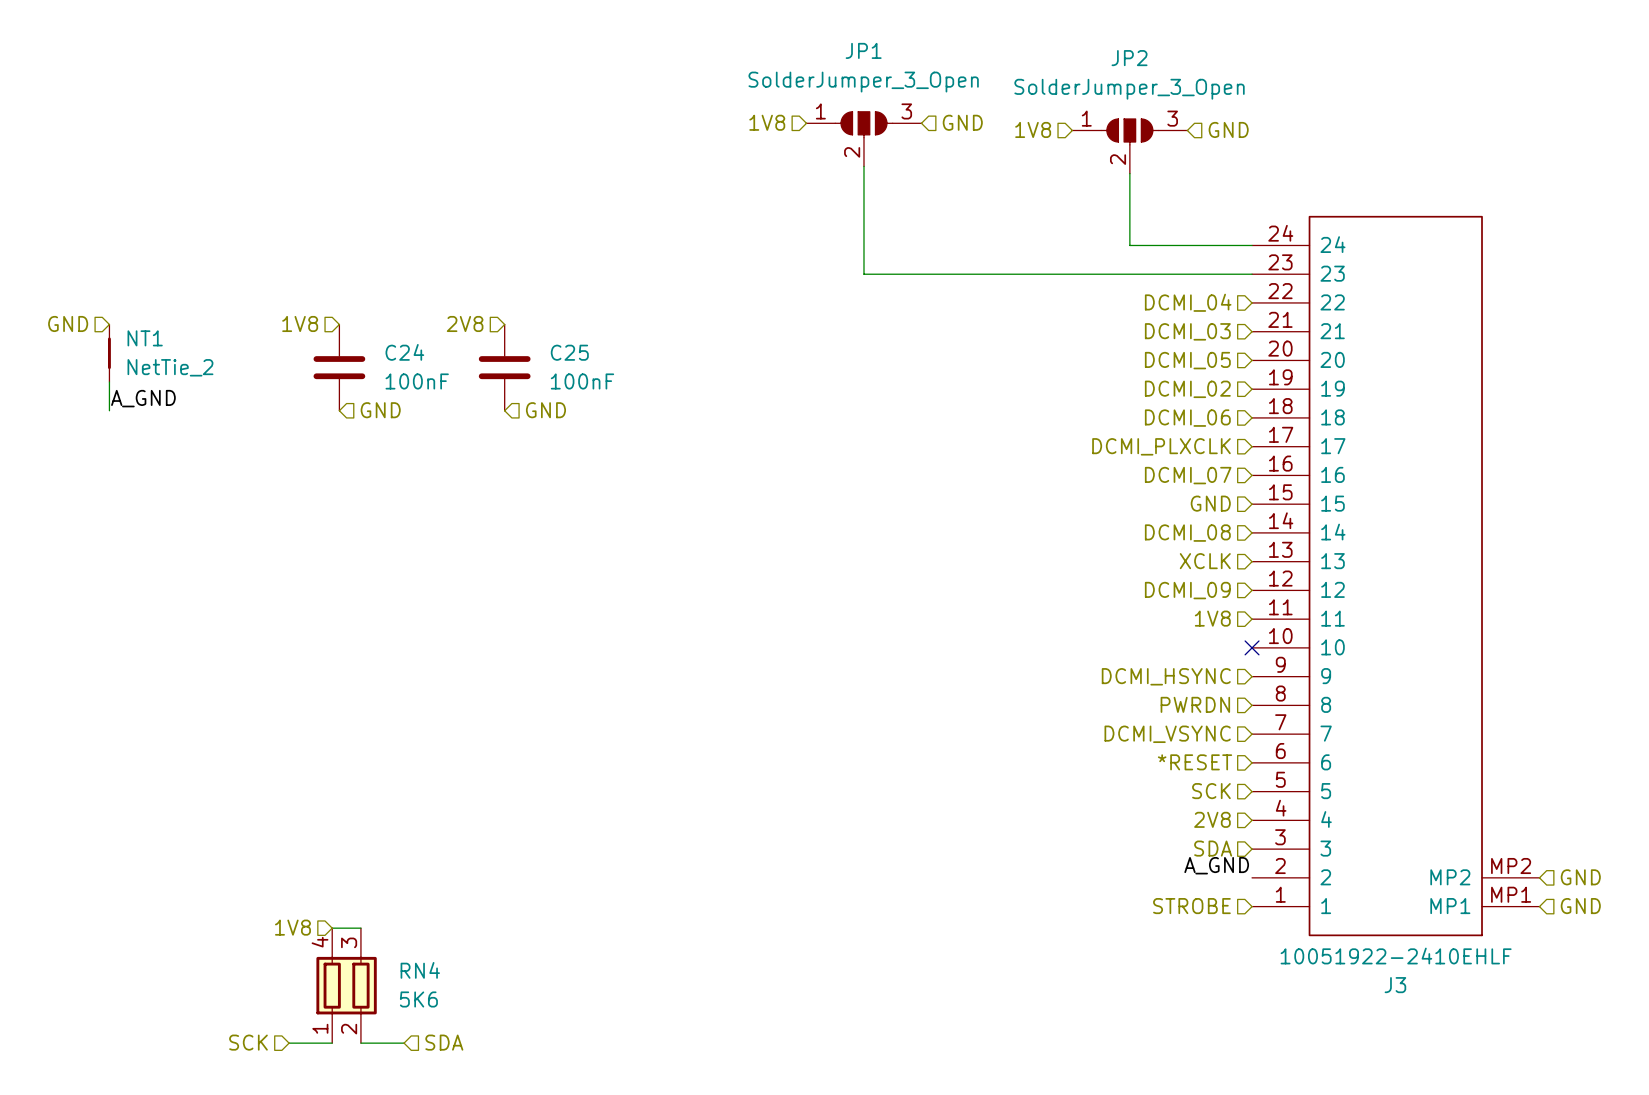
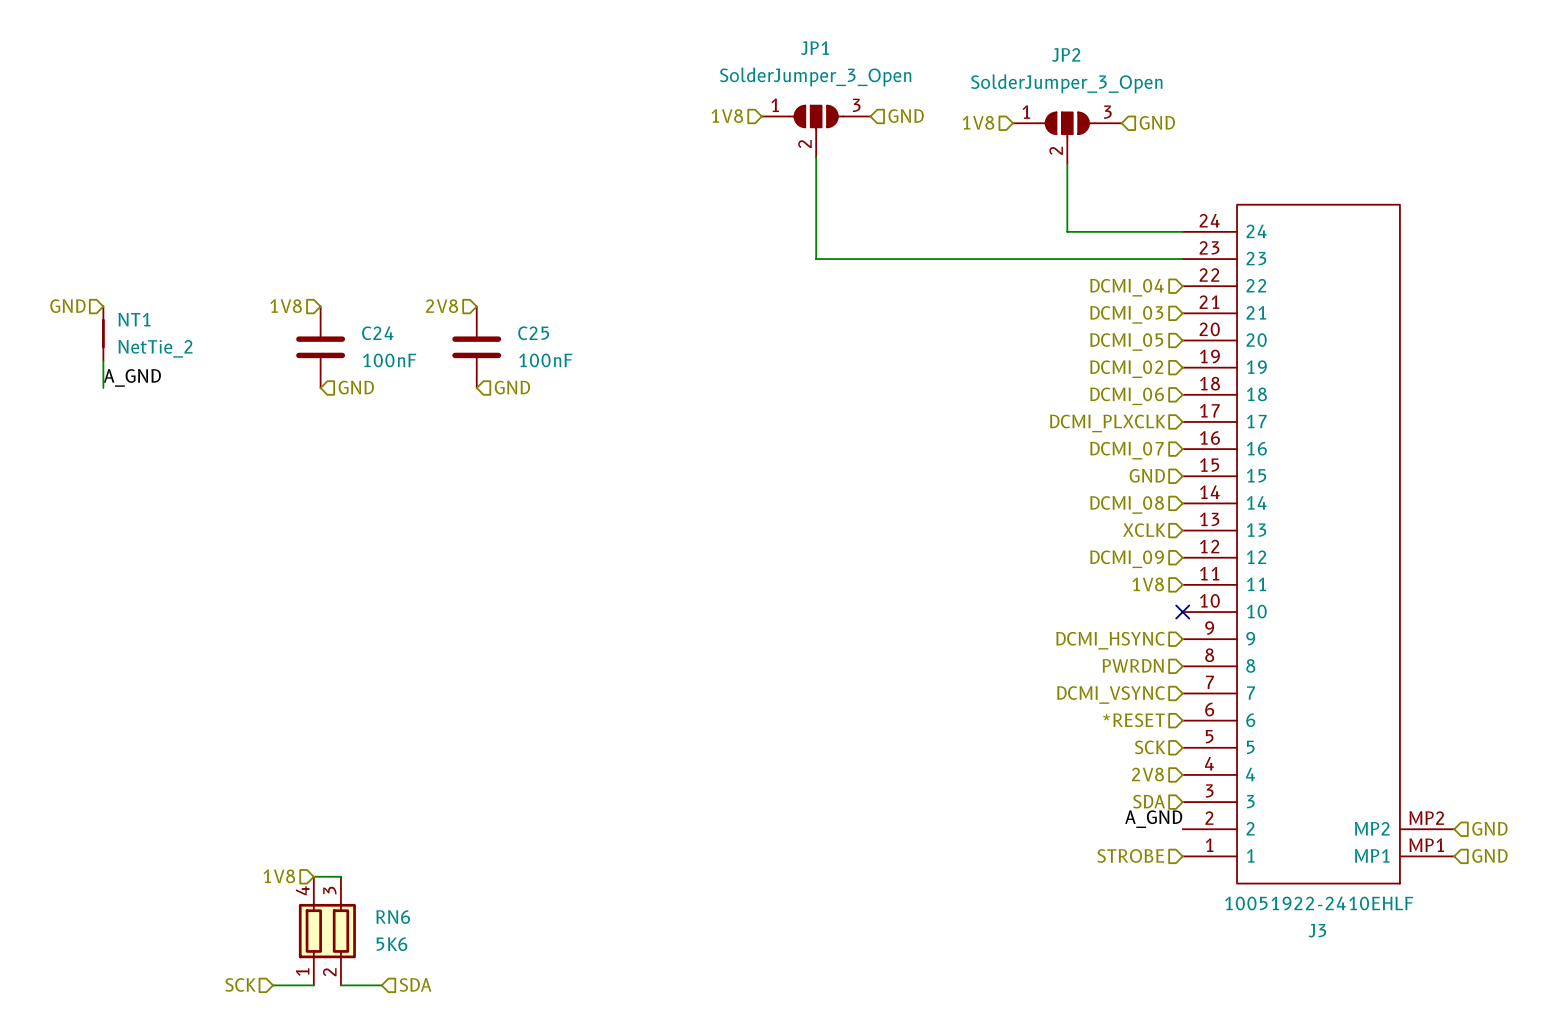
RN4 name: RN4 (420, 970) -> RN6 (393, 917)

